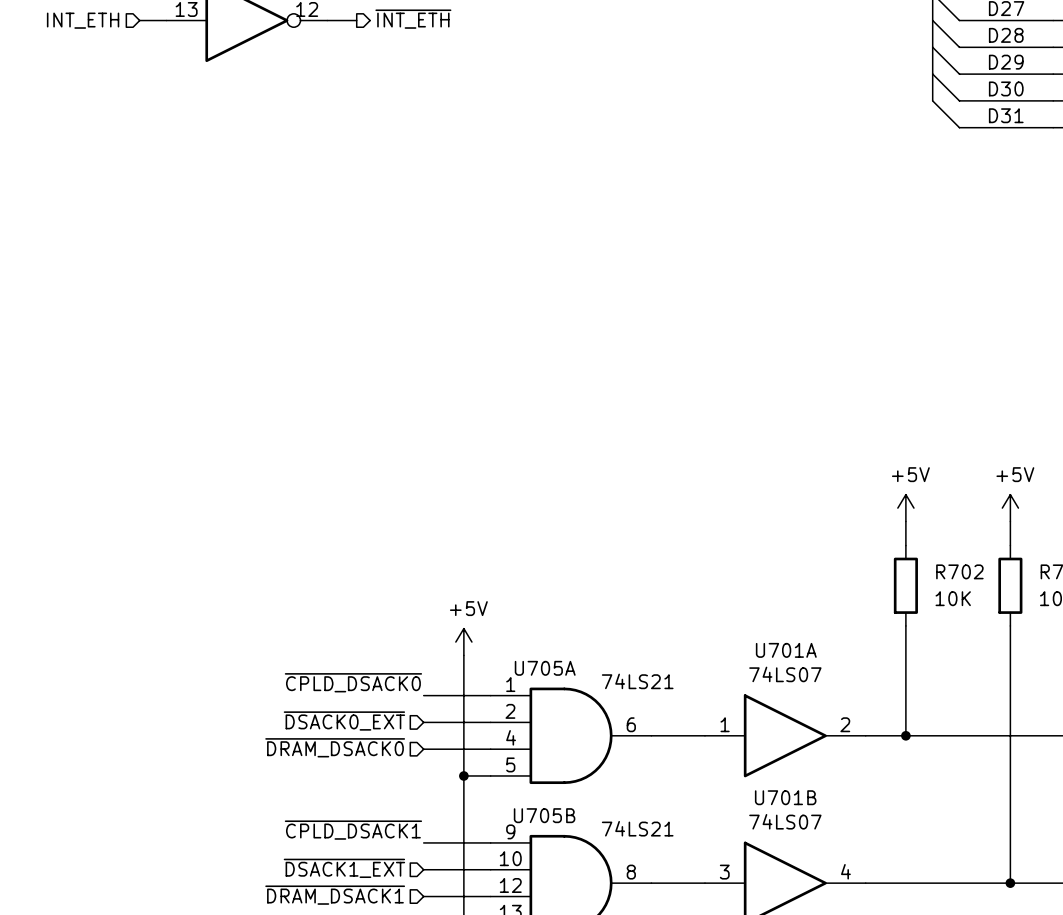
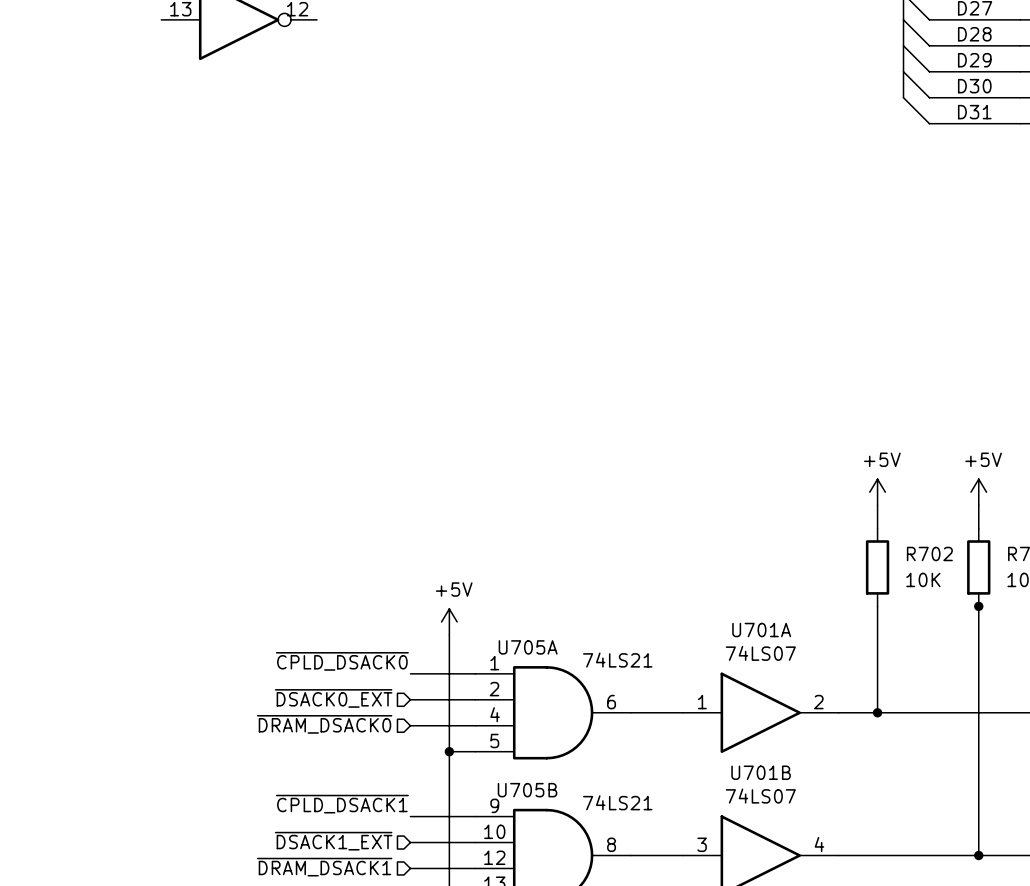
hierarchical label: ~{INT_ETH} (413, 19) -> none
hierarchical label: INT_ETH (83, 20) -> none
wire: (139, 20) (166, 20) -> none
wire: (327, 20) (356, 20) -> none
junction: none -> (978, 606)

